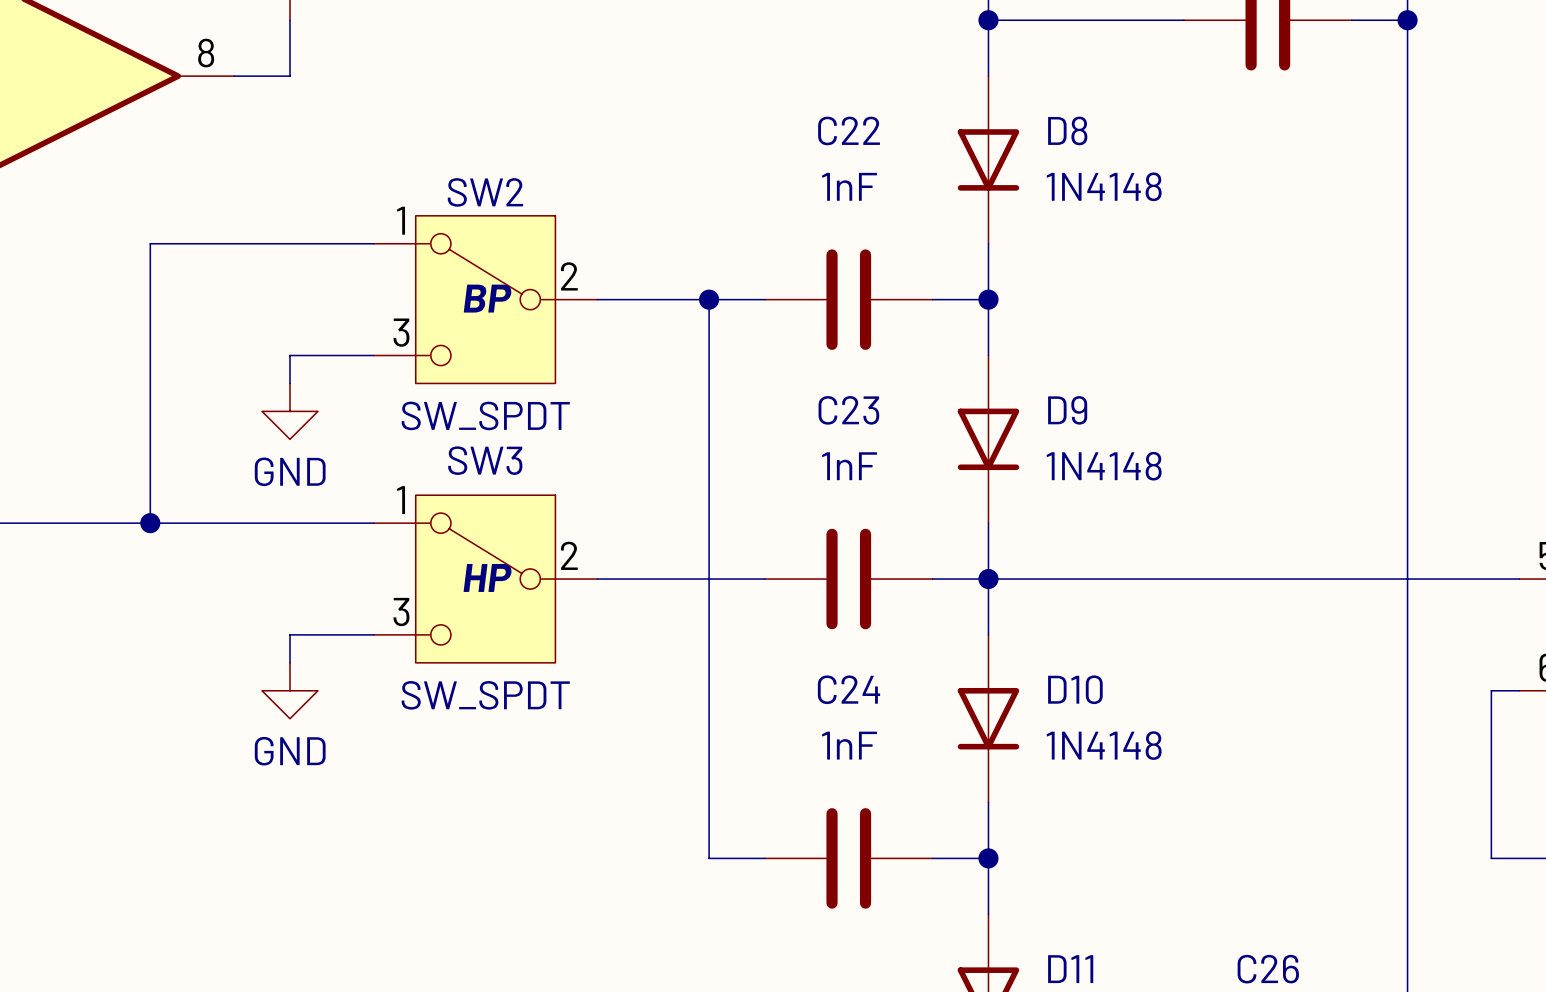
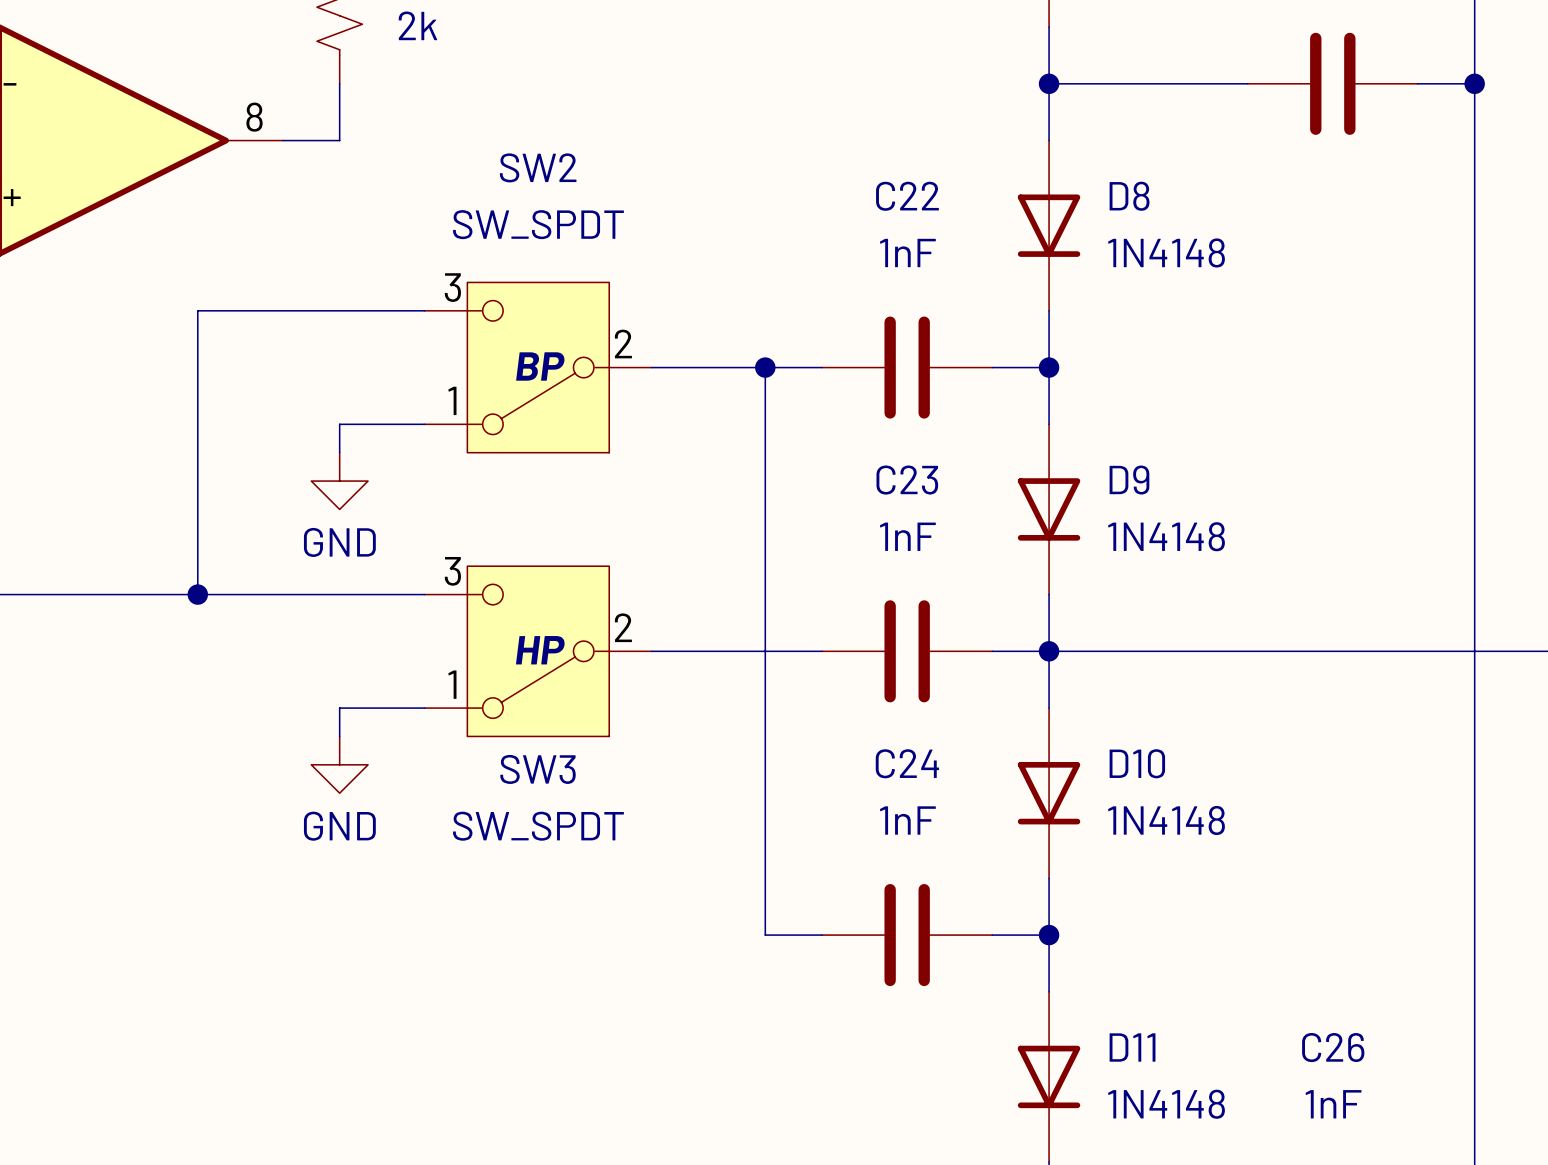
SW2 name position: SW2 (485, 192) -> SW2 (538, 167)
SW2 flip: as is (485, 299) -> up-down (538, 367)
SW3 flip: as is (485, 579) -> up-down (538, 651)
SW3 value position: SW_SPDT (485, 695) -> SW_SPDT (538, 826)

